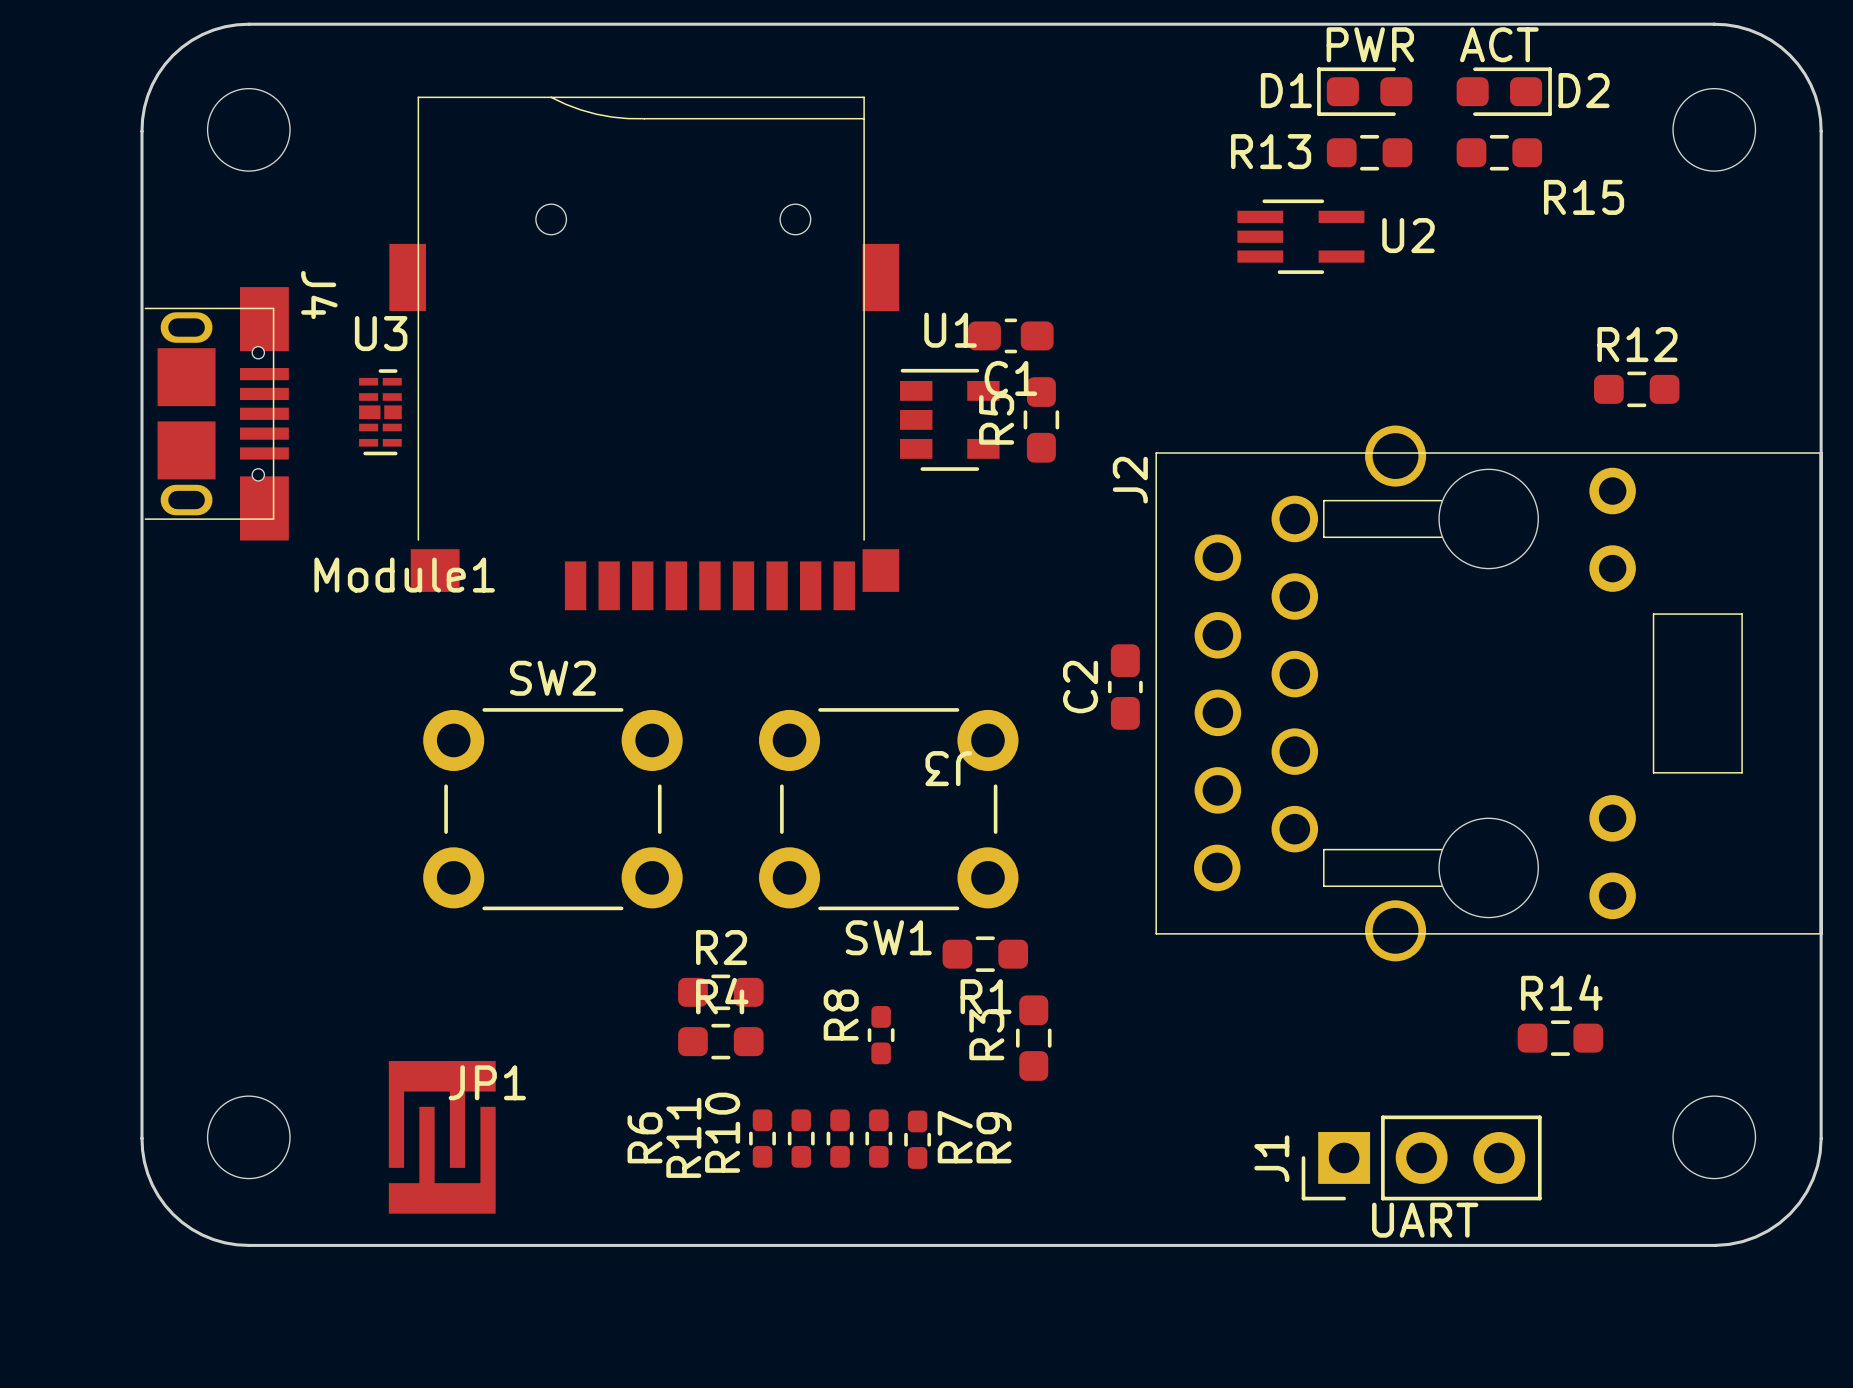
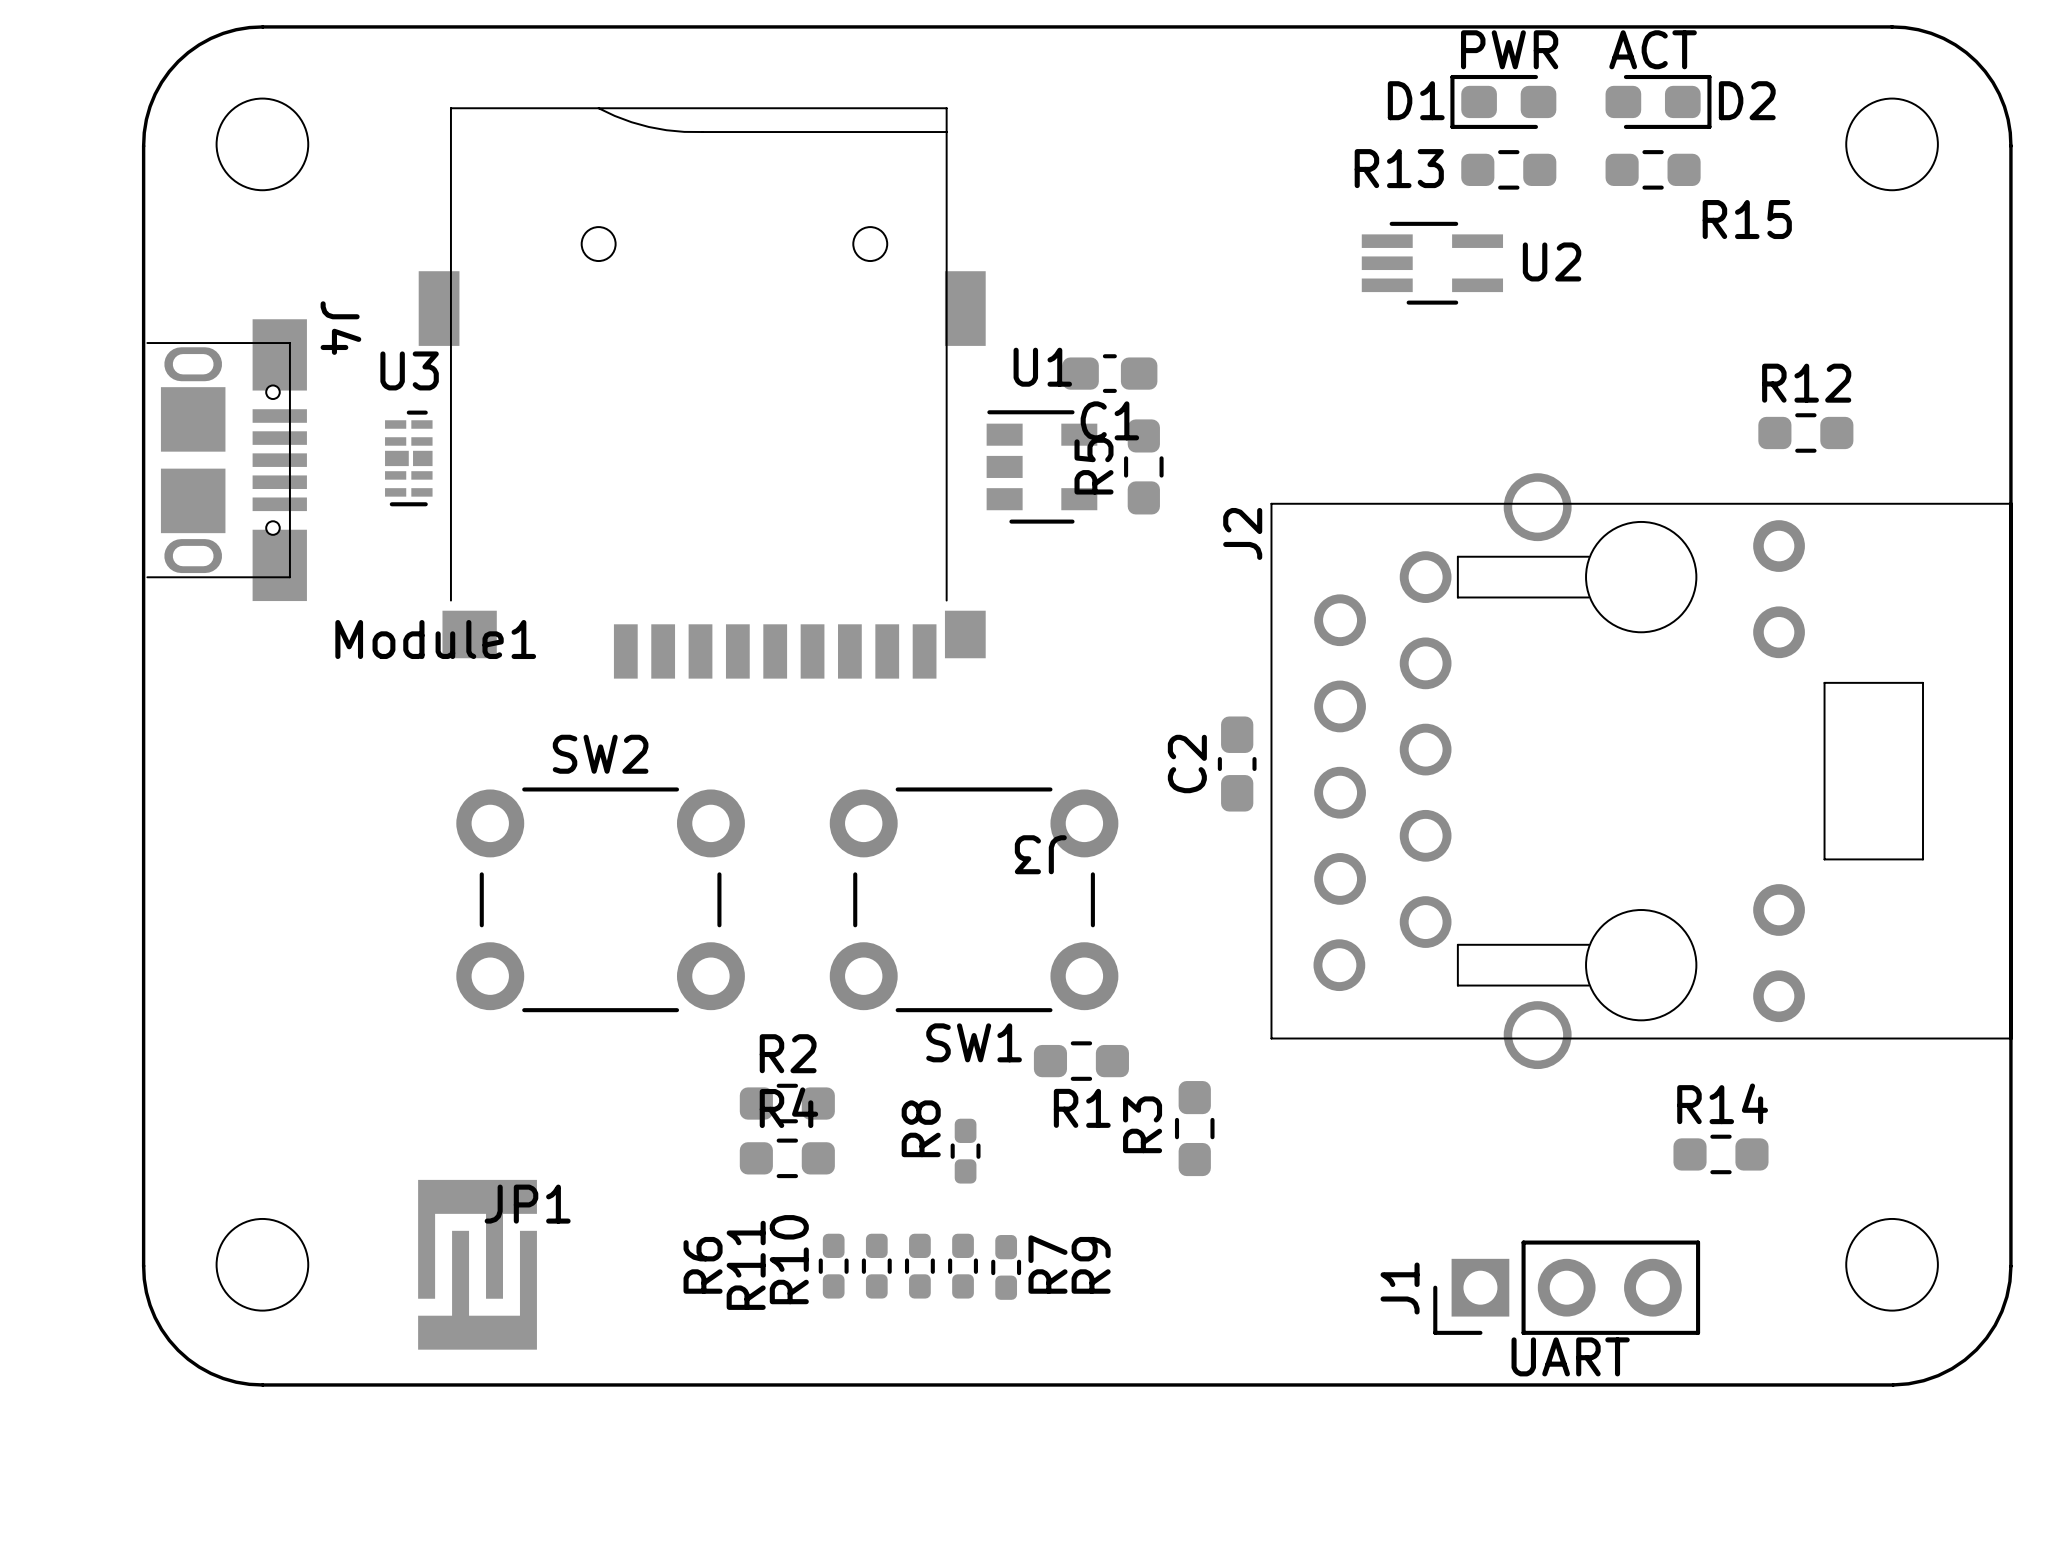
R3 position: (1033, 1038) -> (1194, 1128)

